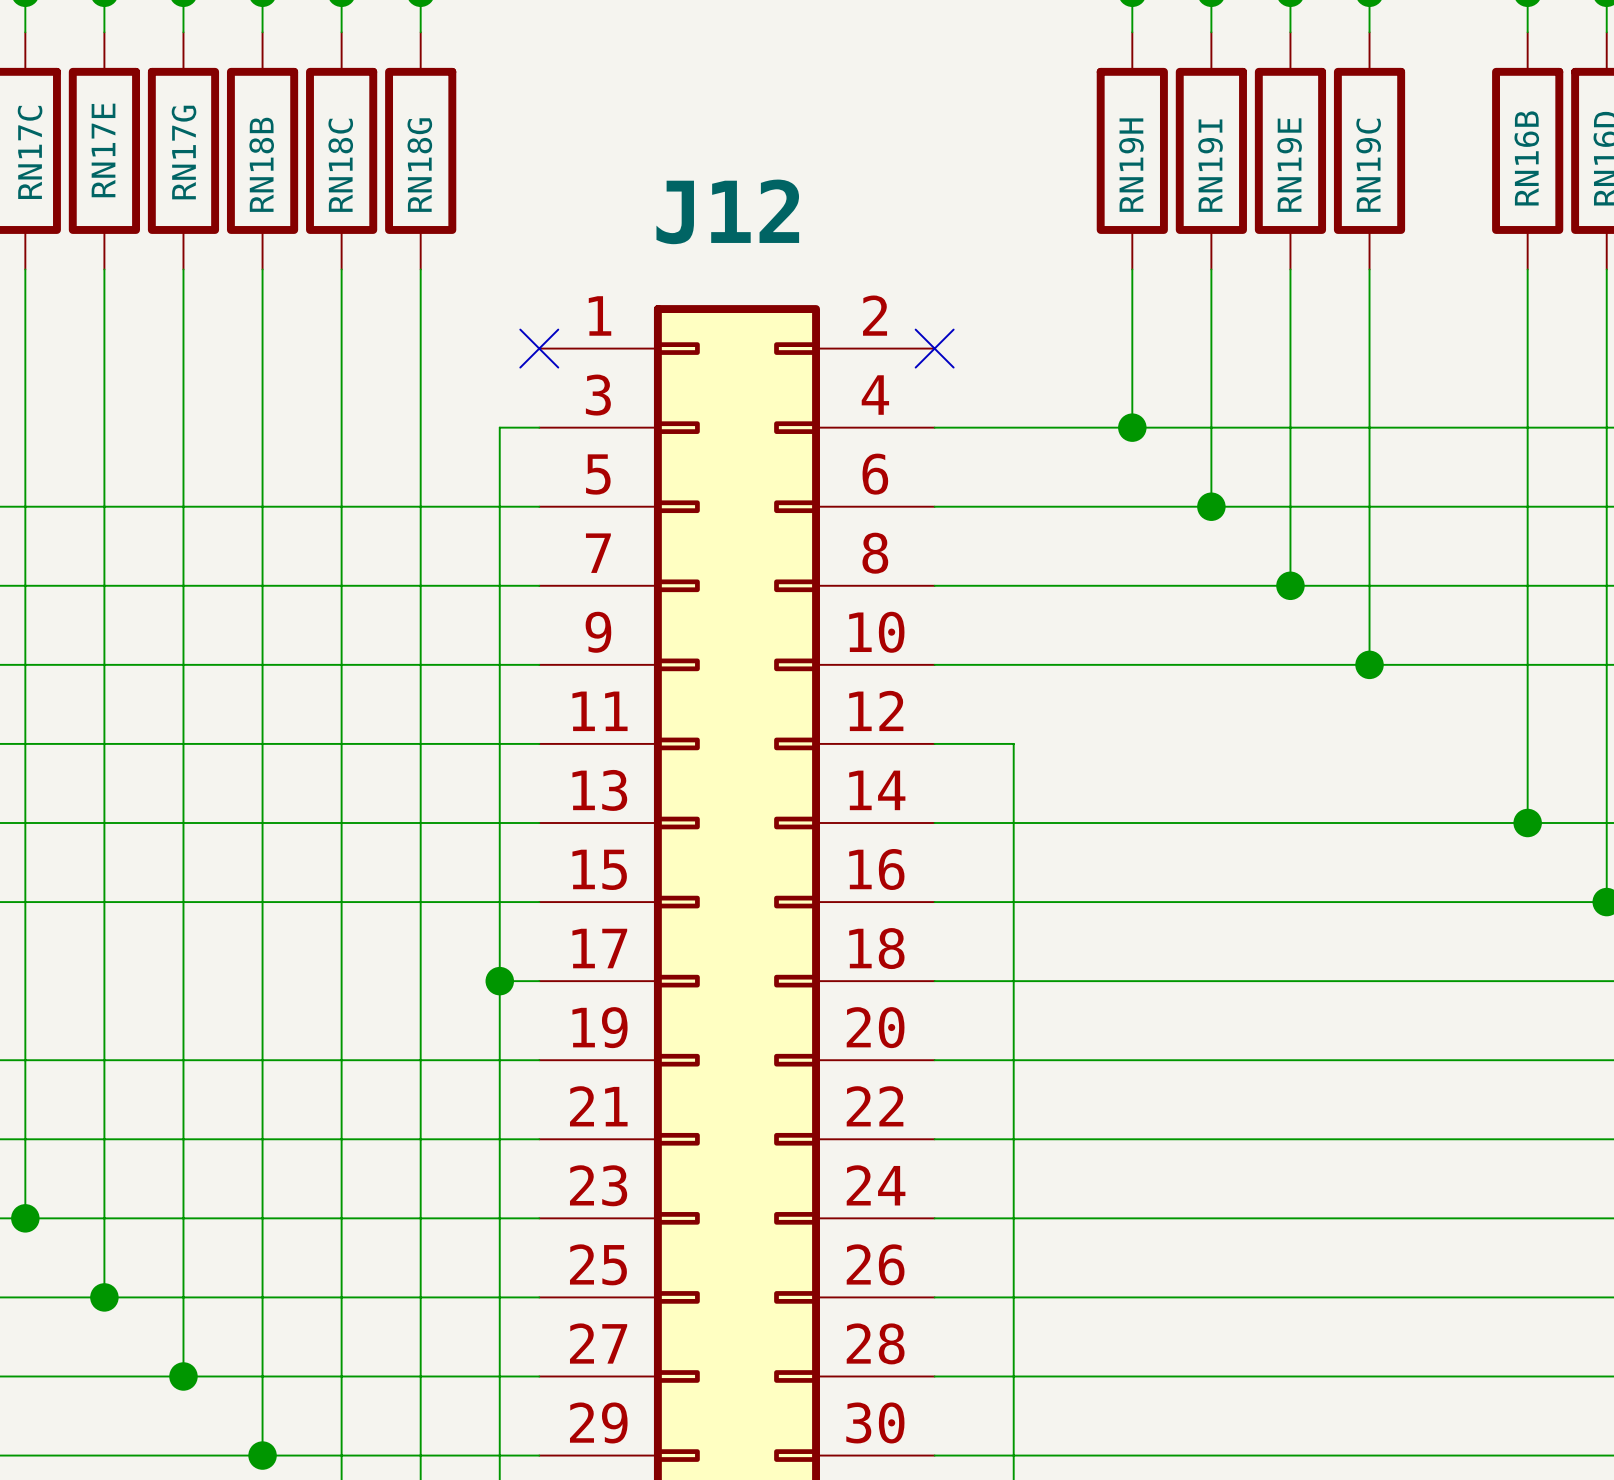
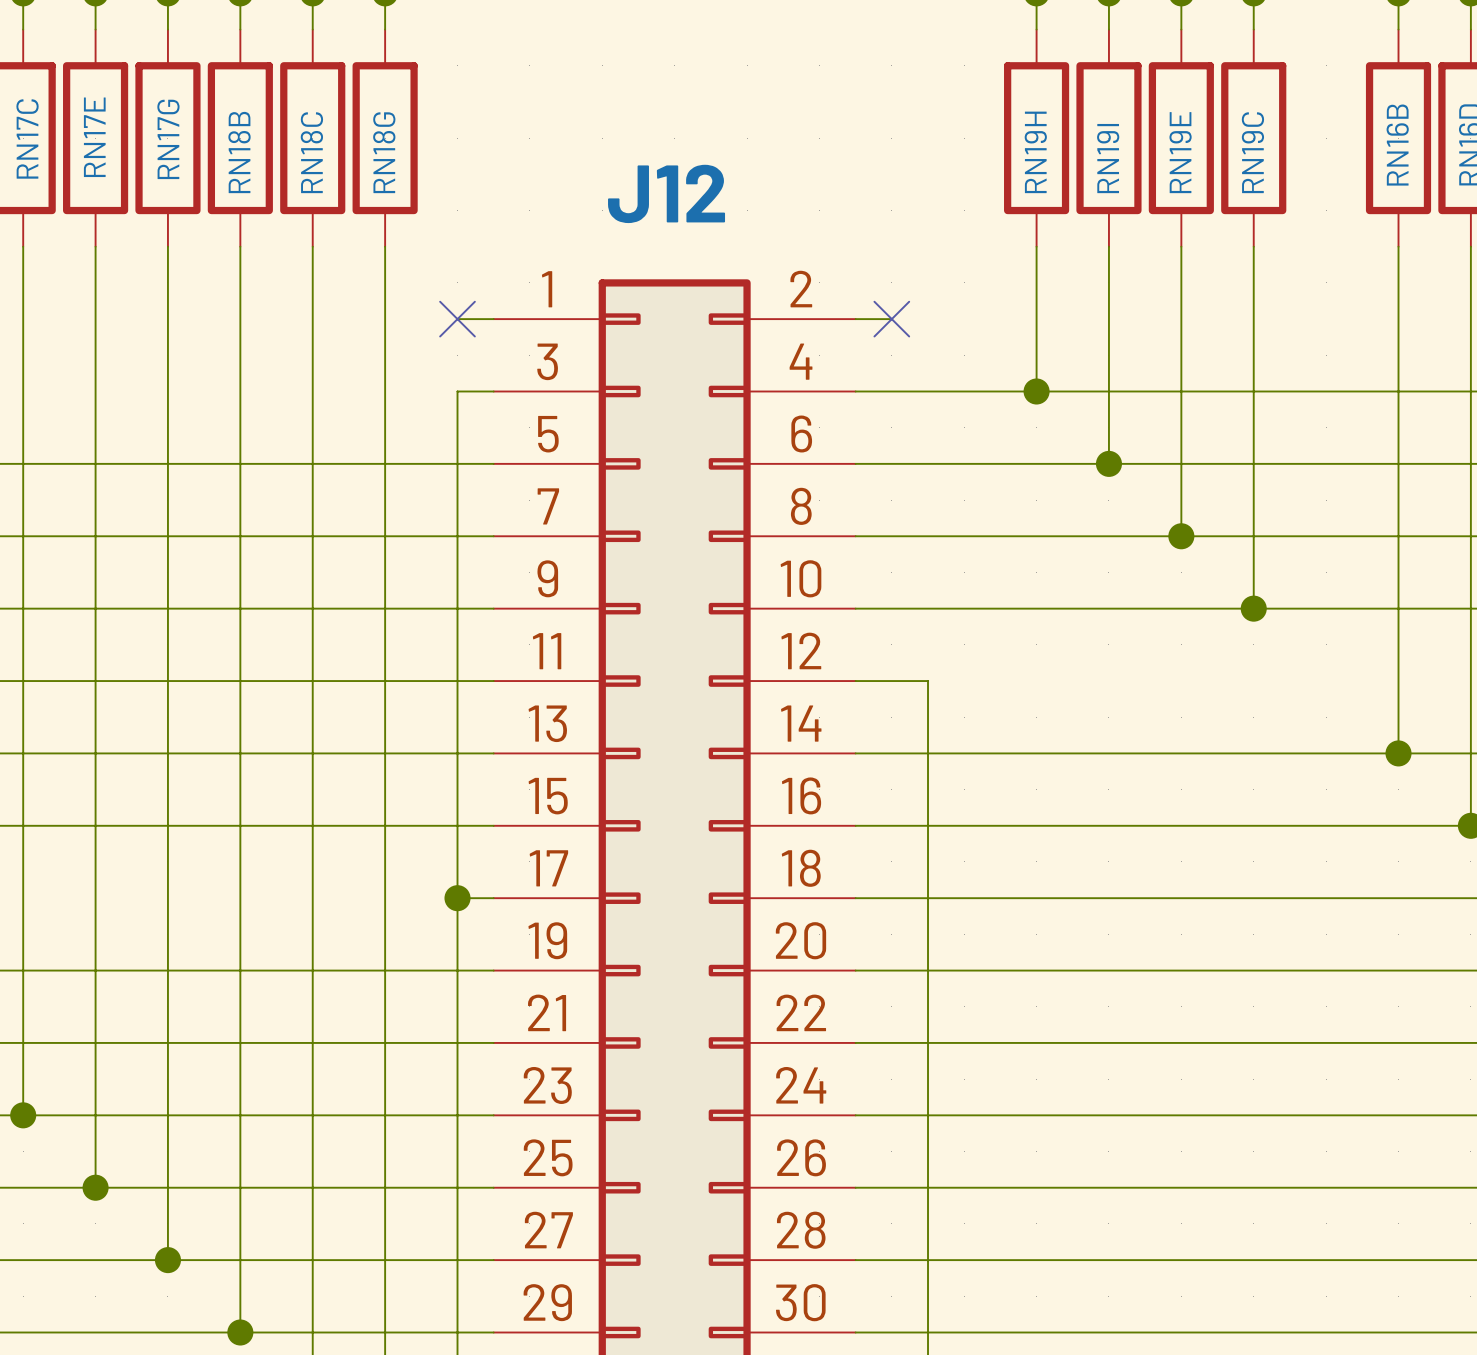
wire: none -> (457, 319) (493, 319)
no-connect mark position: (539, 348) -> (457, 319)
wire: none -> (855, 319) (891, 319)
no-connect mark position: (934, 348) -> (891, 319)

